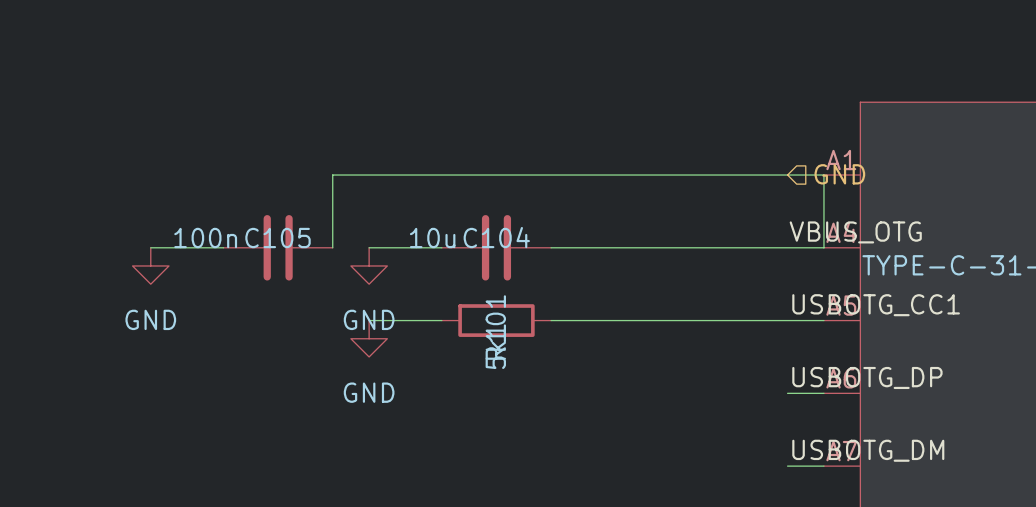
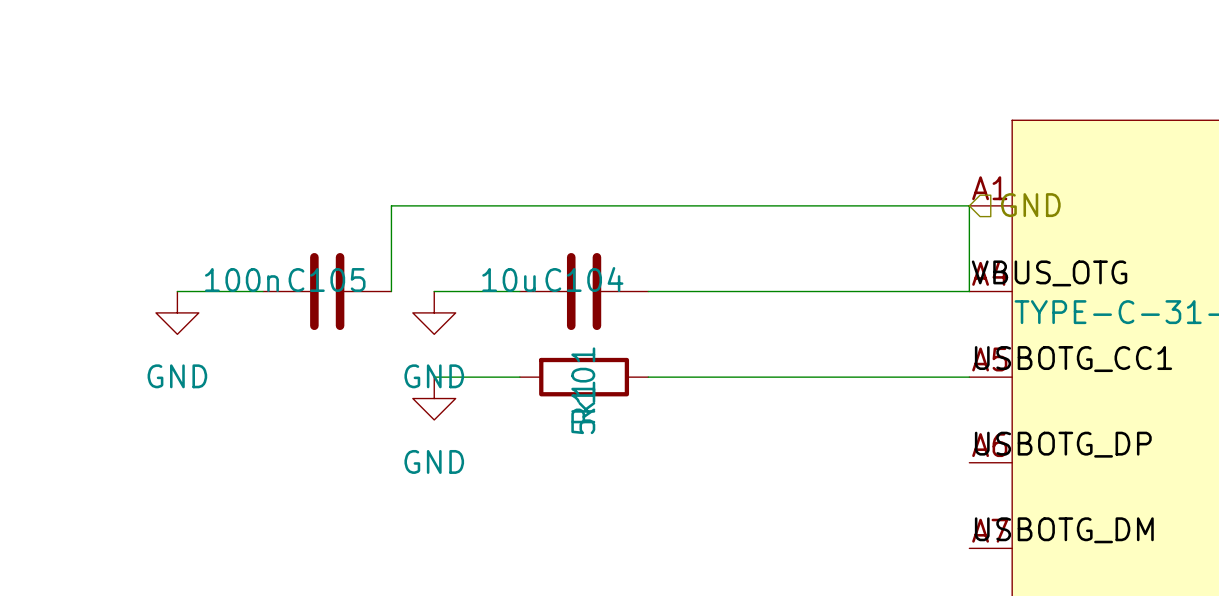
hierarchical label position: GND (839, 174) -> GND (1030, 205)
label position: VBUS_OTG (855, 232) -> VBUS_OTG (1049, 273)
label position: USBOTG_CC1 (876, 305) -> USBOTG_CC1 (1073, 359)
label position: USBOTG_DP (867, 377) -> USBOTG_DP (1063, 444)
wire: (787, 393) (823, 393) -> none
label position: USBOTG_DM (868, 450) -> USBOTG_DM (1064, 530)
wire: (787, 466) (823, 466) -> none

